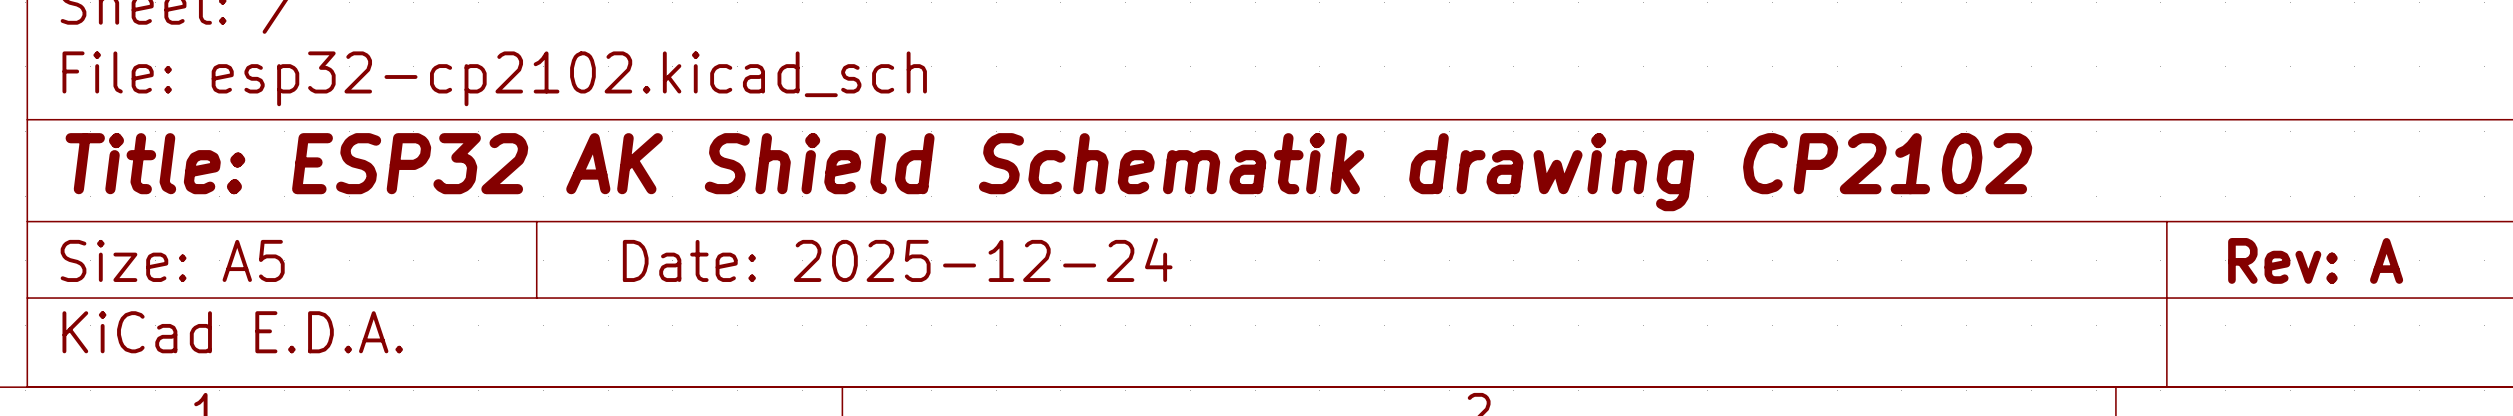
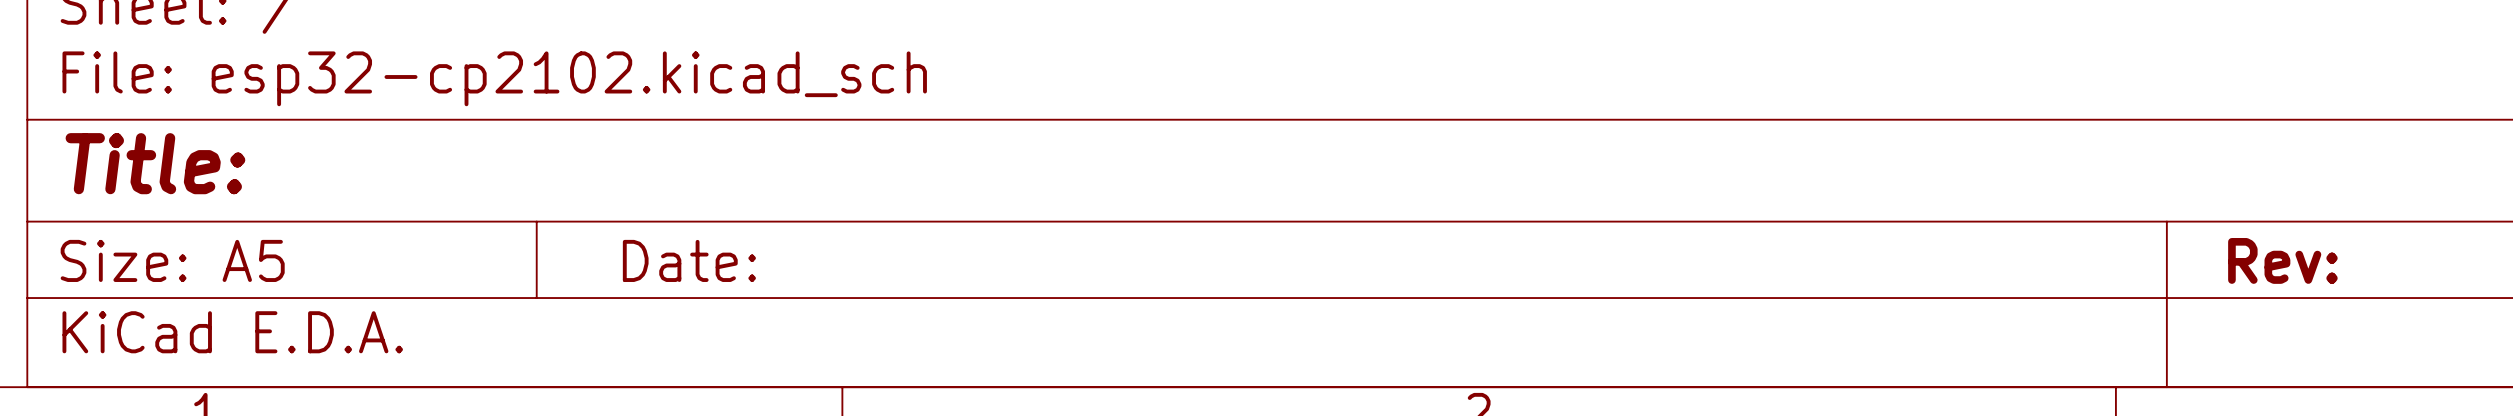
title block: Title: ESP32 AK Shield Schematik drawing CP2102 (1048, 172) -> Title: (155, 163)
title block: Date: 2025-12-24 (897, 260) -> Date: (689, 260)
title block: Rev: A (2315, 260) -> Rev: (2282, 260)

